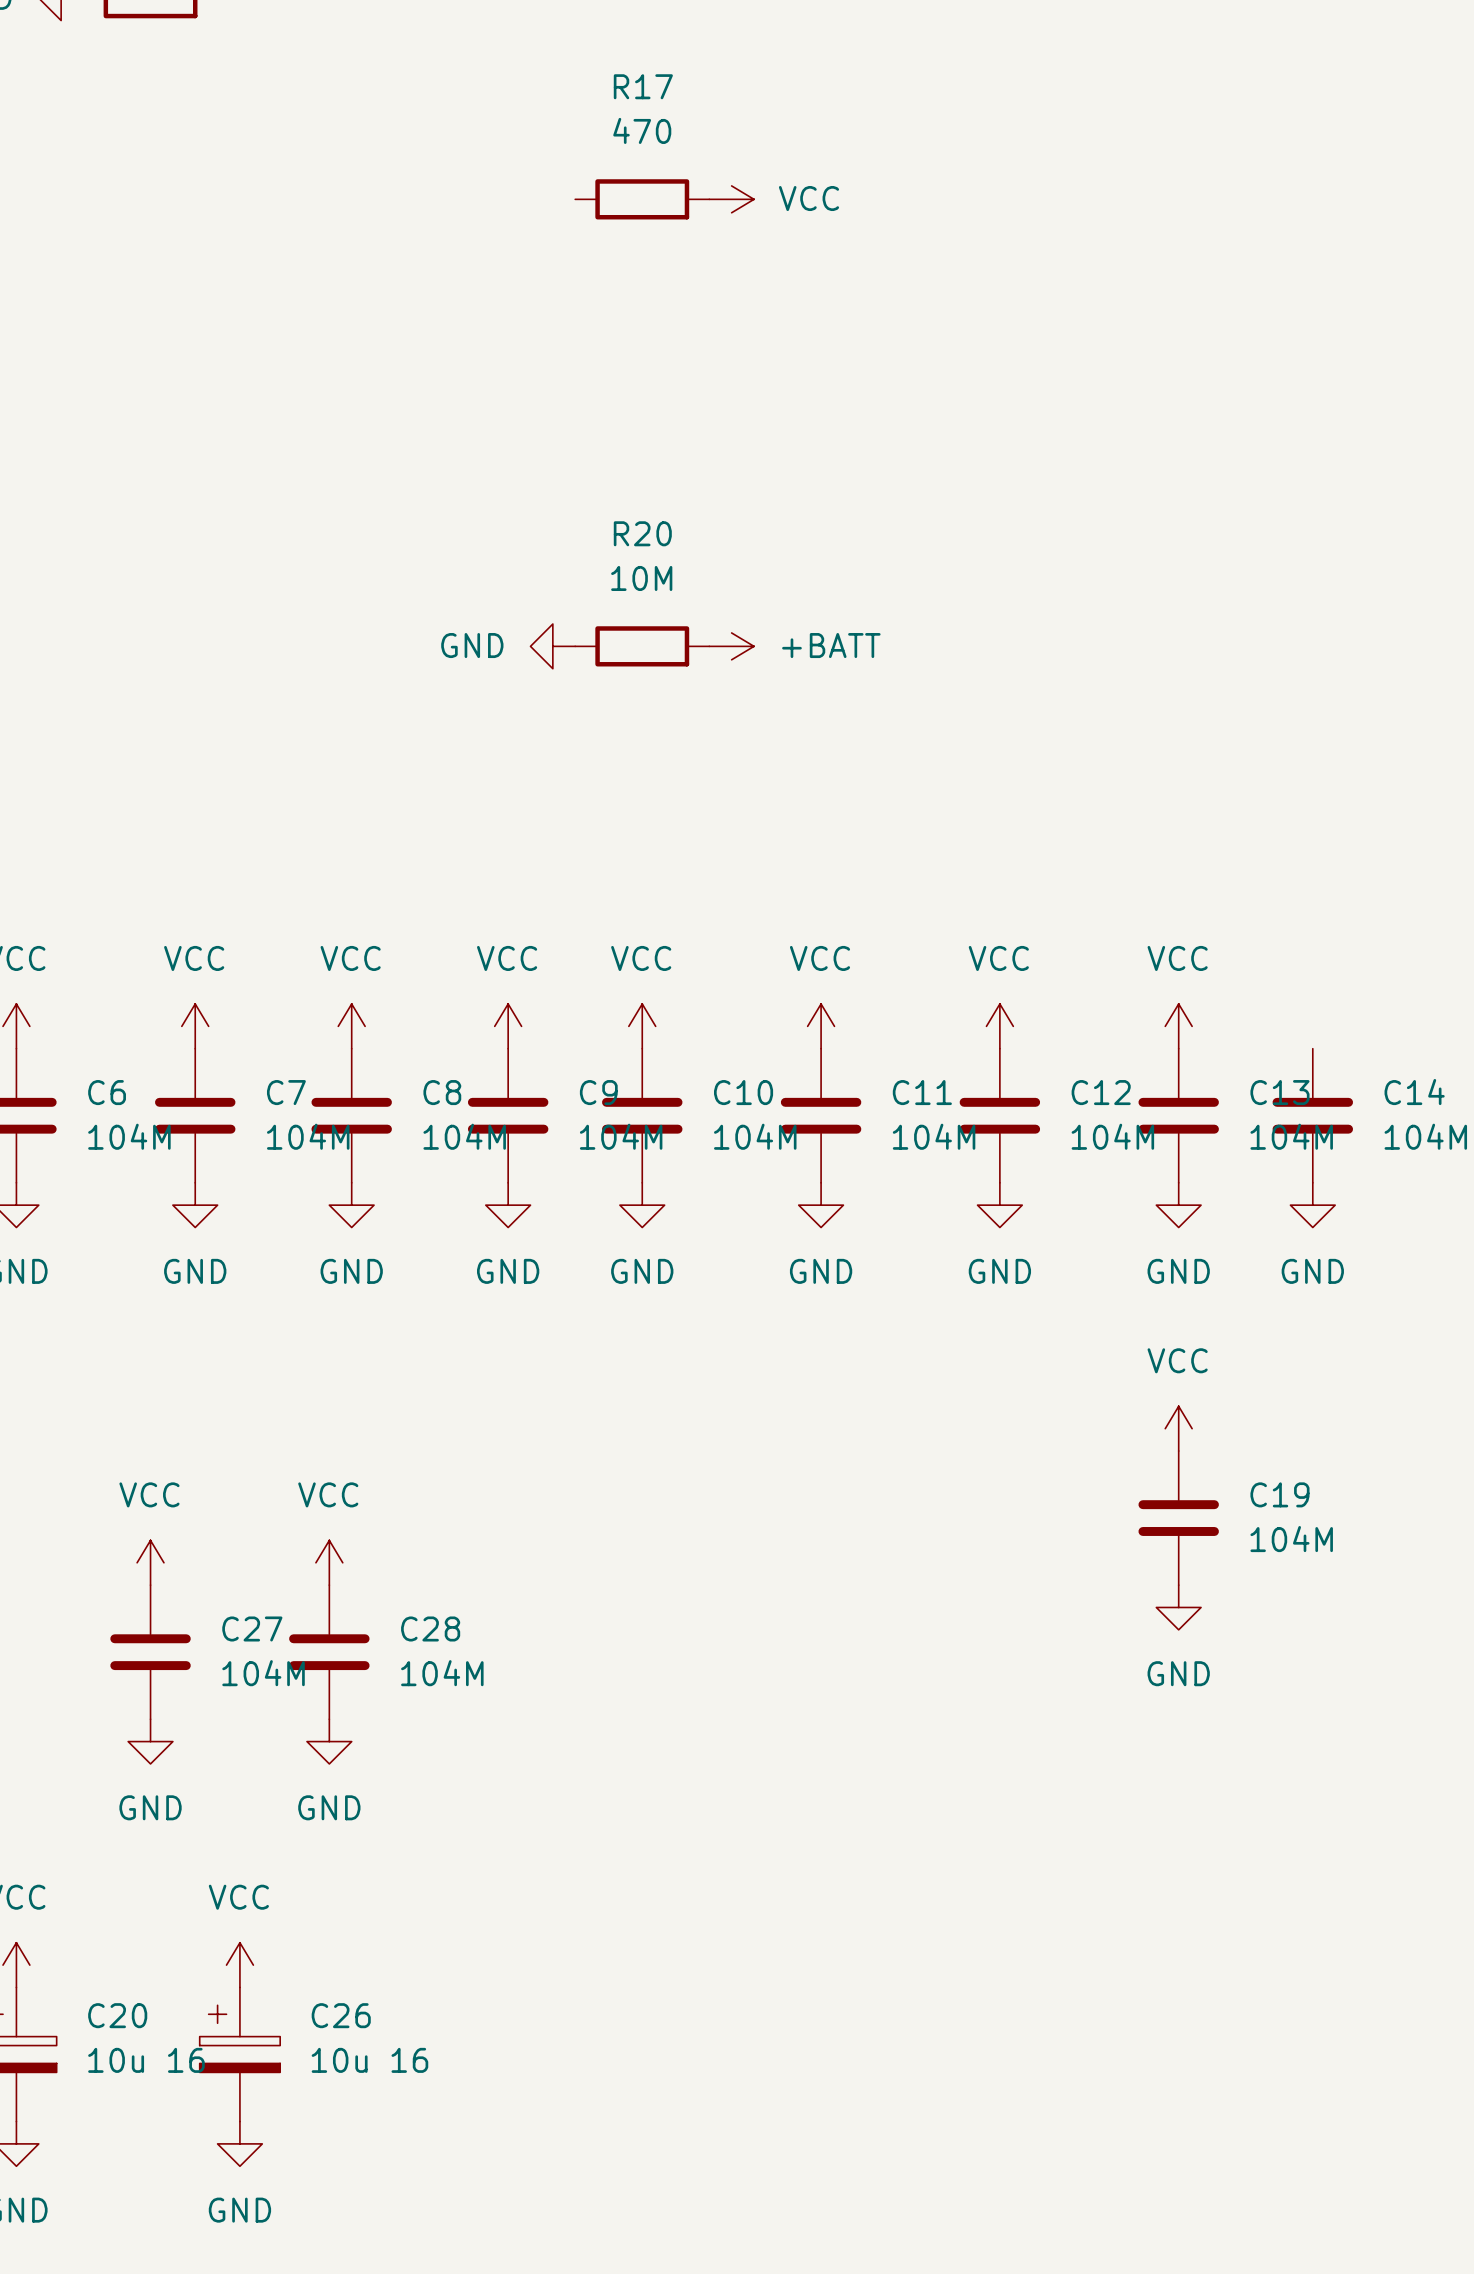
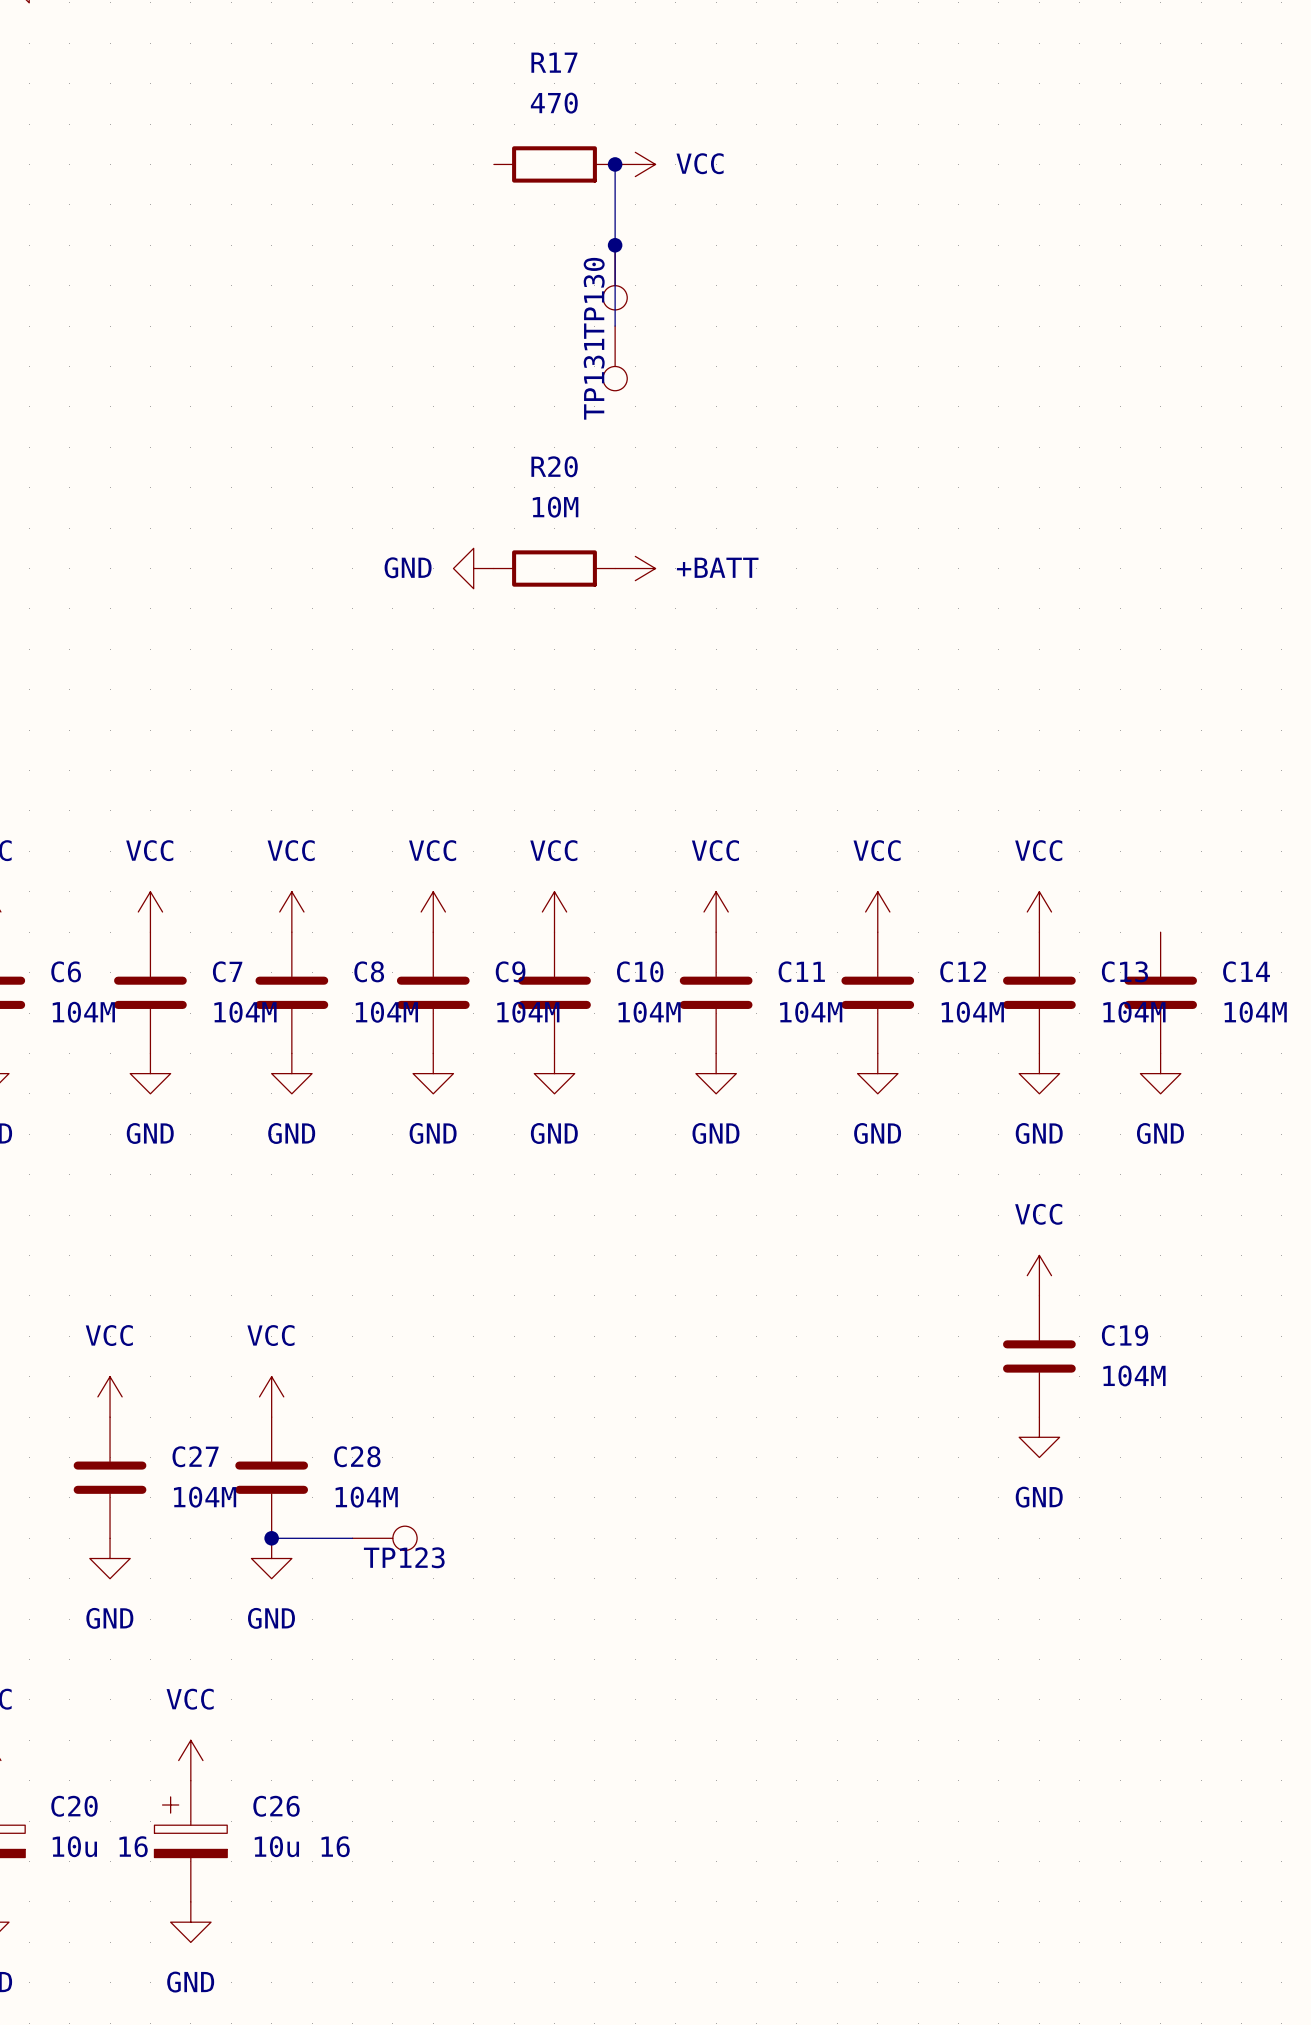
wire: none -> (615, 164) (615, 326)
junction: none -> (615, 164)
junction: none -> (615, 245)
TP130: none -> (615, 277)
TP131: none -> (615, 358)
wire: none -> (271, 1538) (352, 1538)
junction: none -> (271, 1538)
TP123: none -> (384, 1538)

